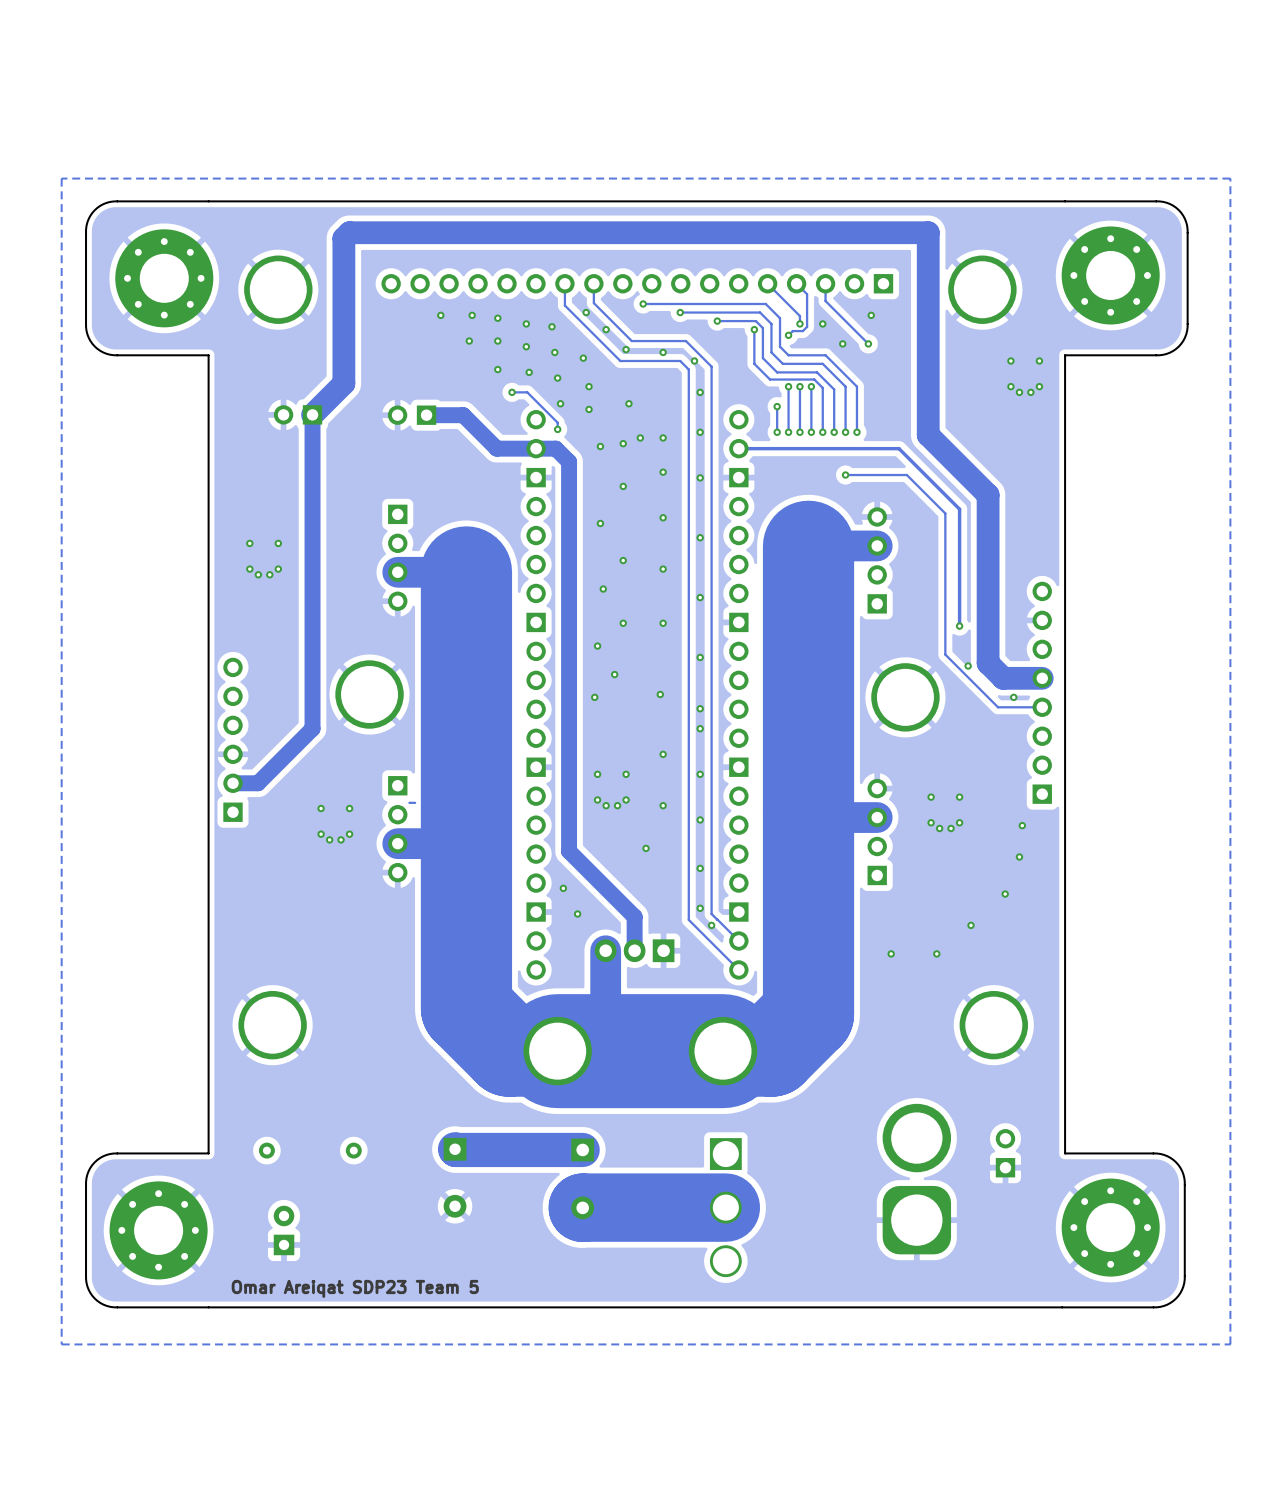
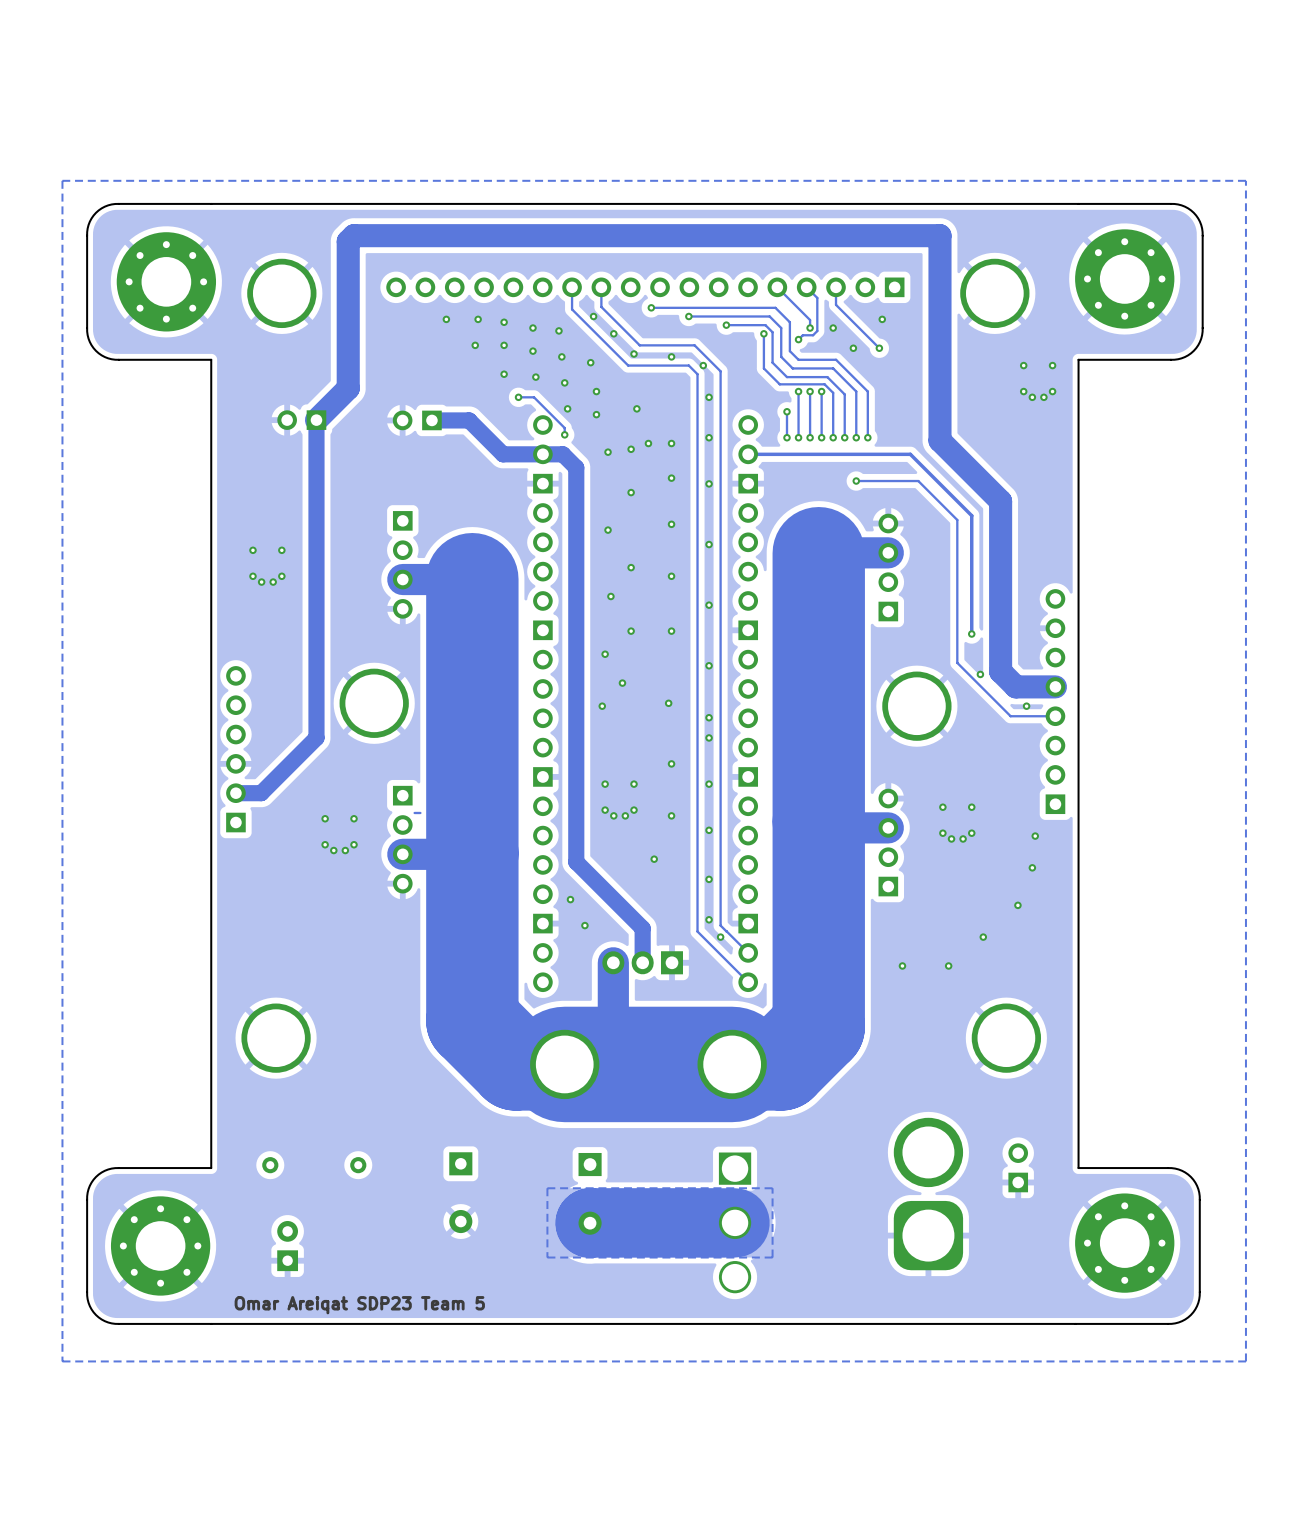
track: (455, 1149) (582, 1149) -> none
zone outline: none -> (772, 1188) (772, 1257) (547, 1257) (547, 1188) (772, 1188)

